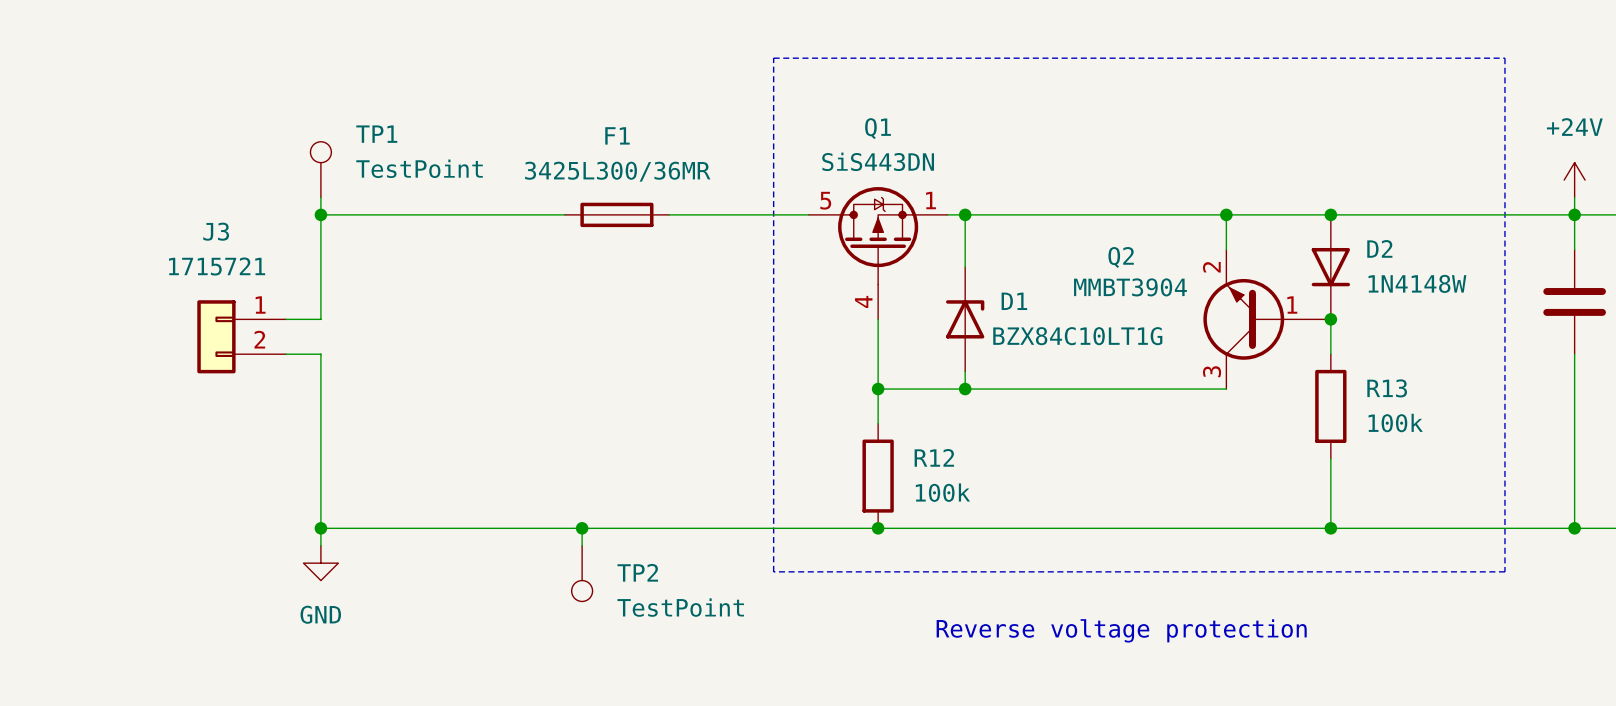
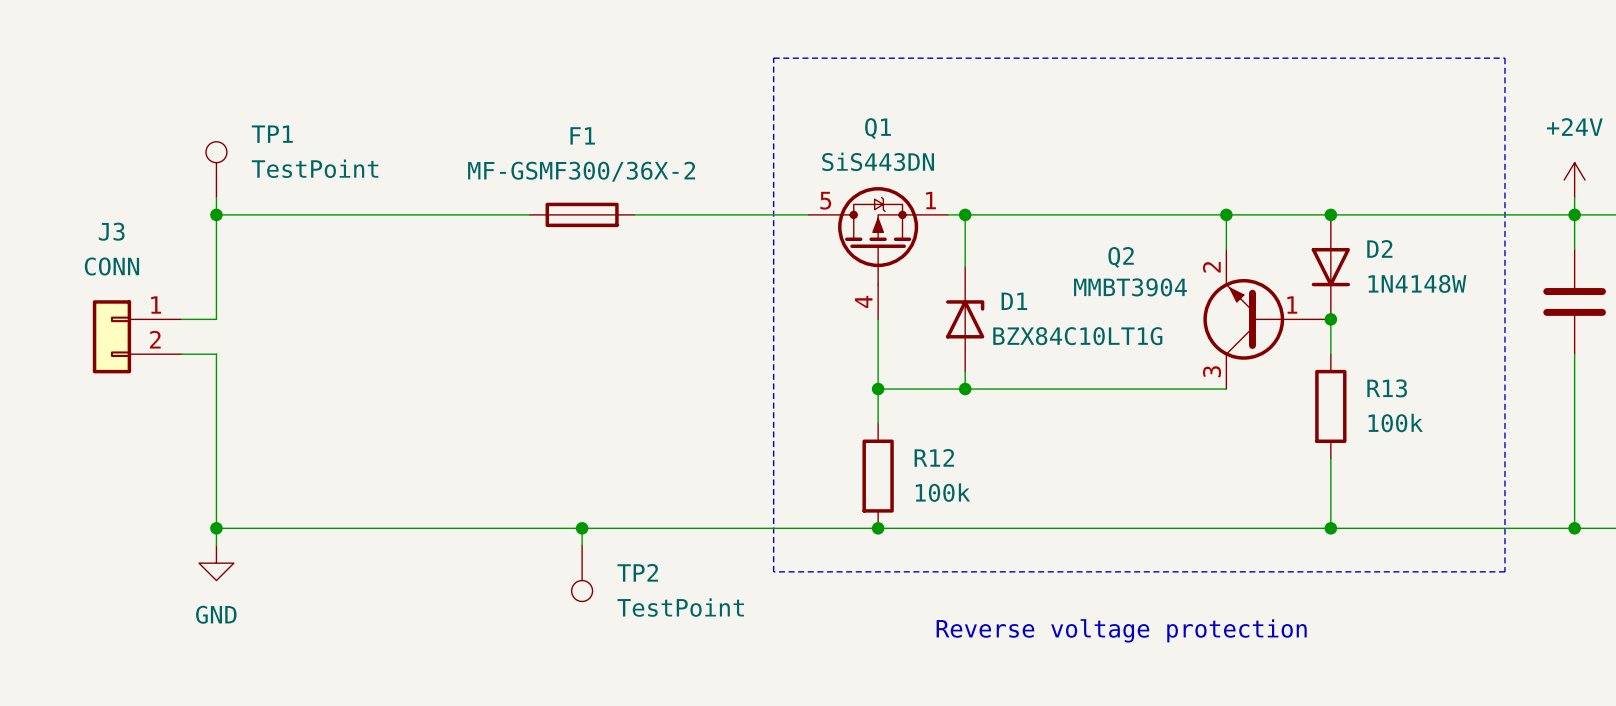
TP1 position: (320, 169) -> (216, 169)
F1 value: 3425L300/36MR (617, 171) -> MF-GSMF300/36X-2 (581, 171)
wire: (320, 197) (320, 319) (286, 319) -> (216, 197) (216, 319) (181, 319)
wire: none -> (216, 214) (320, 214)
junction: none -> (216, 214)
junction: (320, 214) -> none
F1 position: (616, 214) -> (582, 214)
J3 value: 1715721 (217, 266) -> CONN (111, 266)
J3 position: (241, 336) -> (137, 336)
wire: (286, 354) (320, 354) (320, 545) -> (181, 354) (216, 354) (216, 545)
wire: none -> (216, 528) (320, 528)
junction: none -> (216, 528)
junction: (320, 528) -> none
power symbol position: GND (320, 563) -> GND (216, 563)

